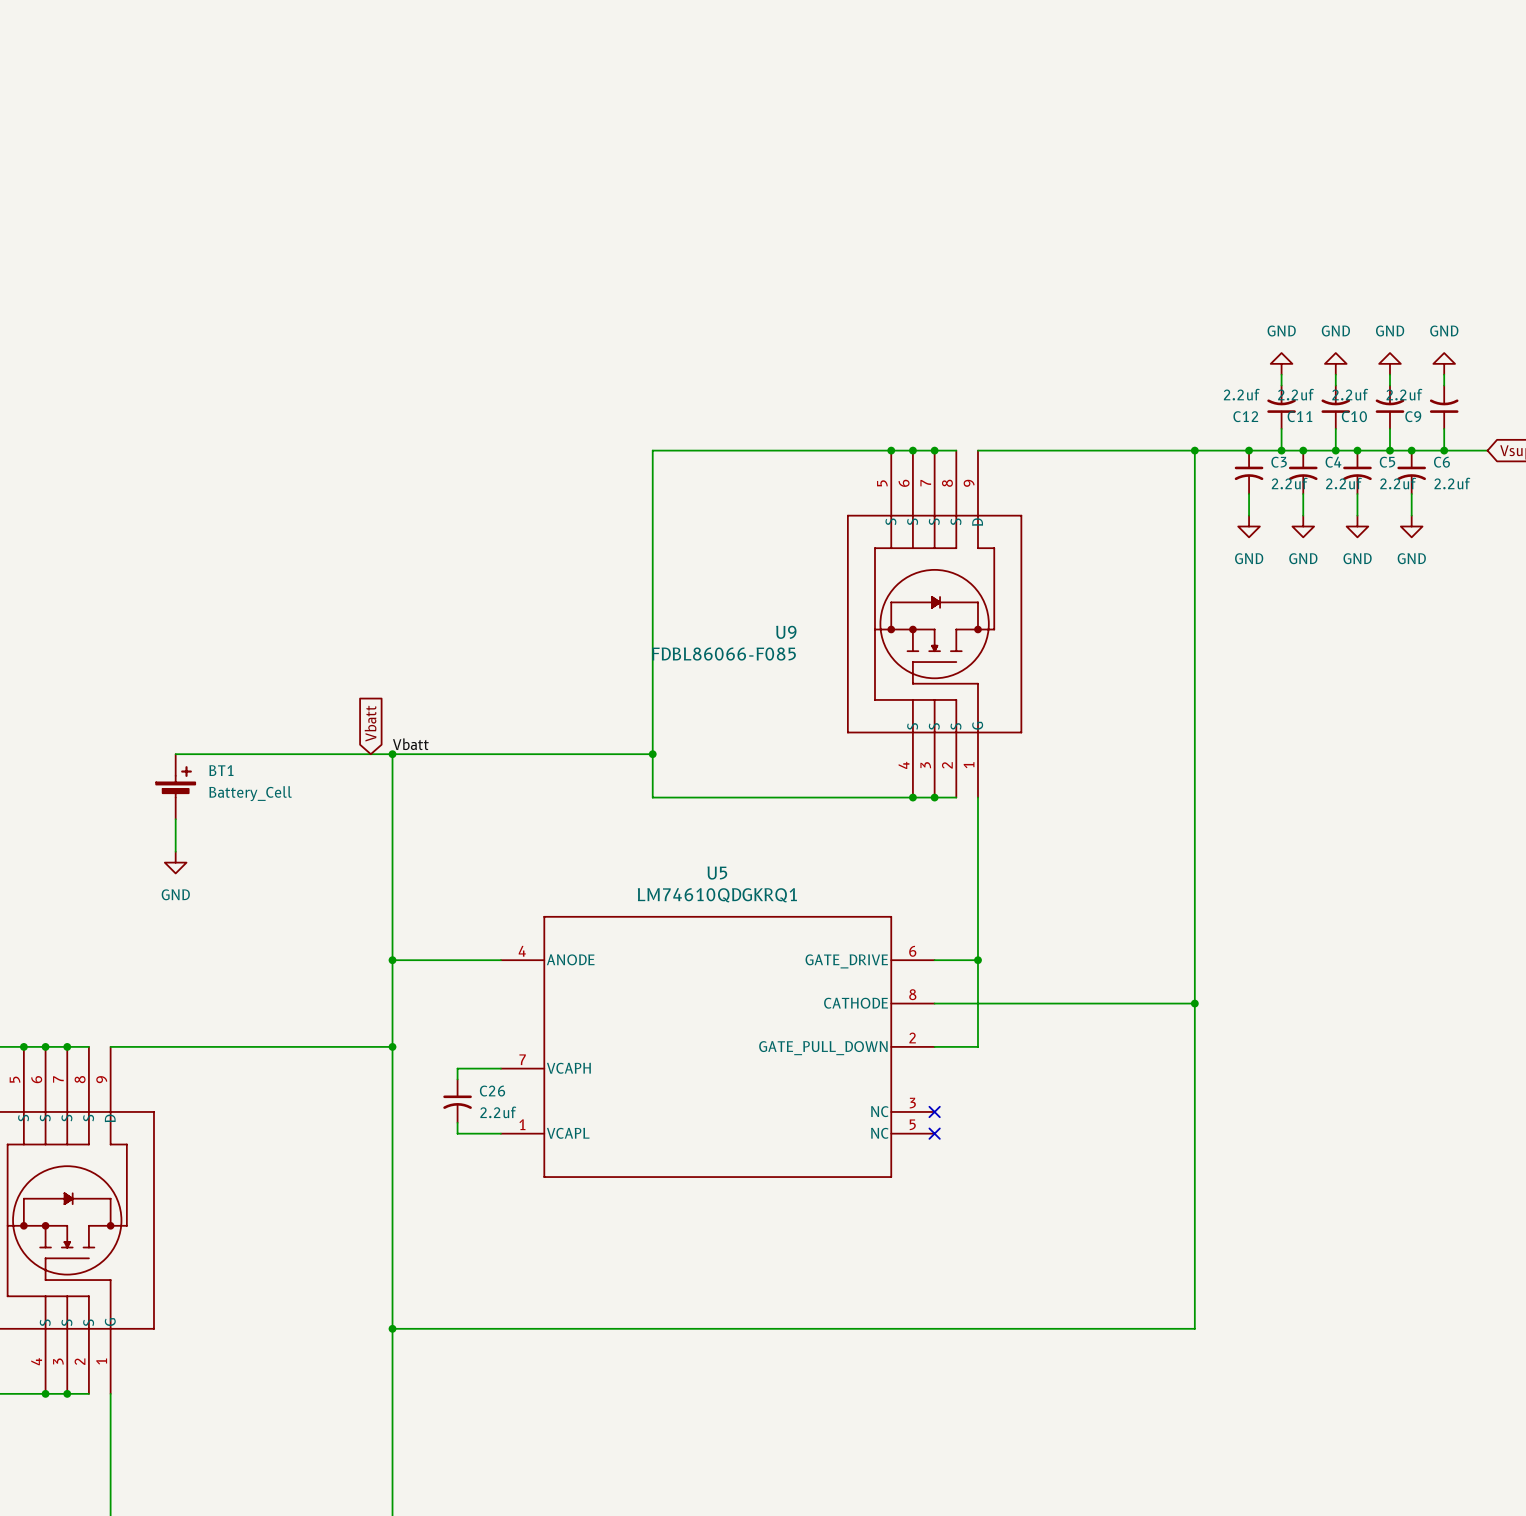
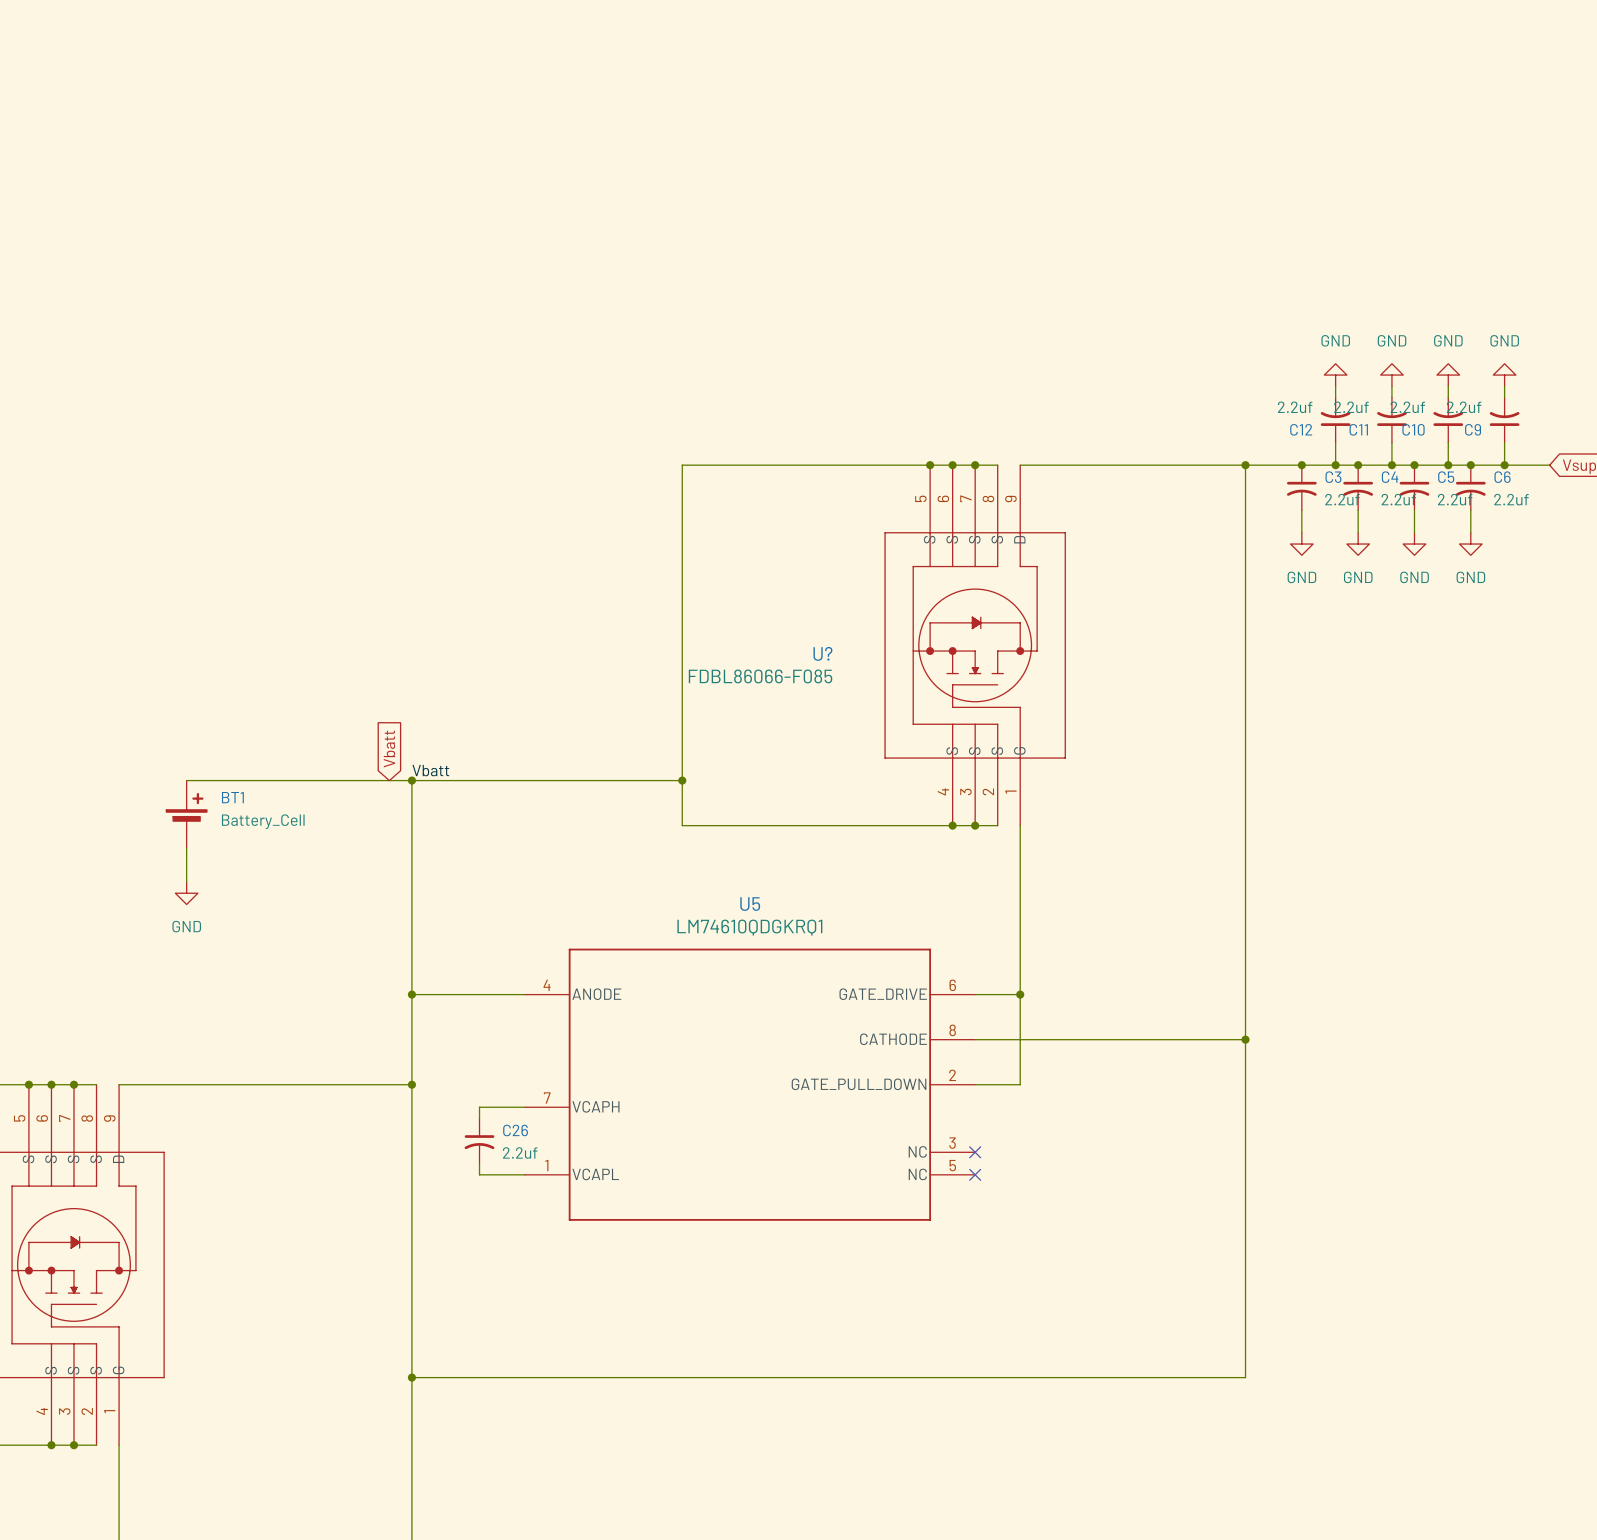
U9 name: U9 (786, 632) -> U? (822, 653)

